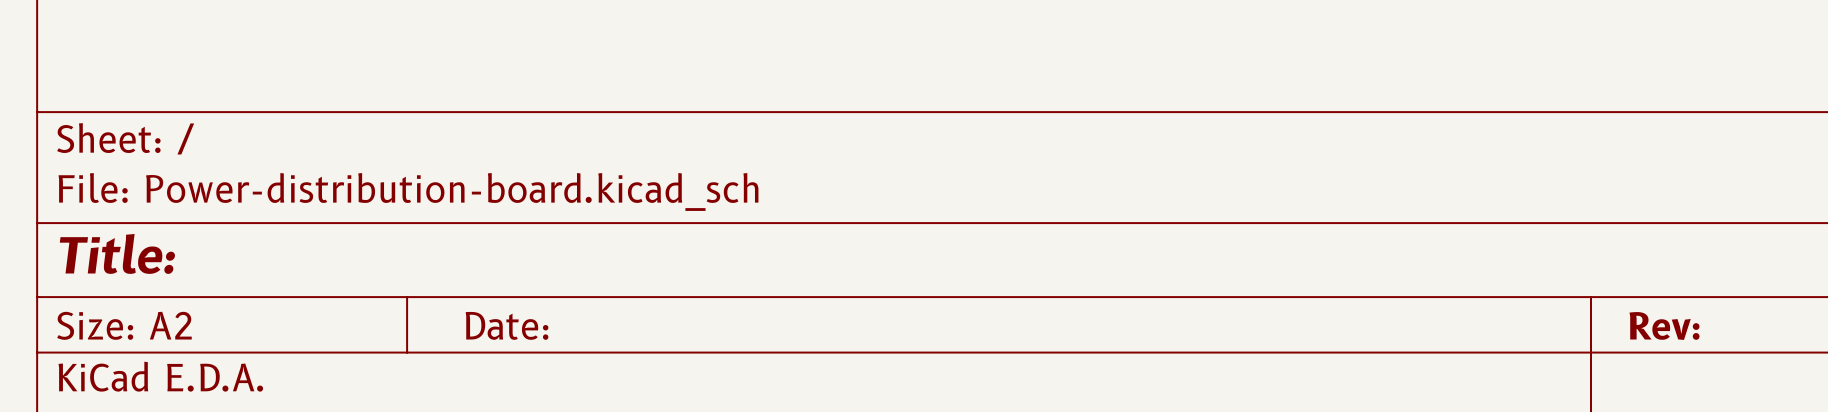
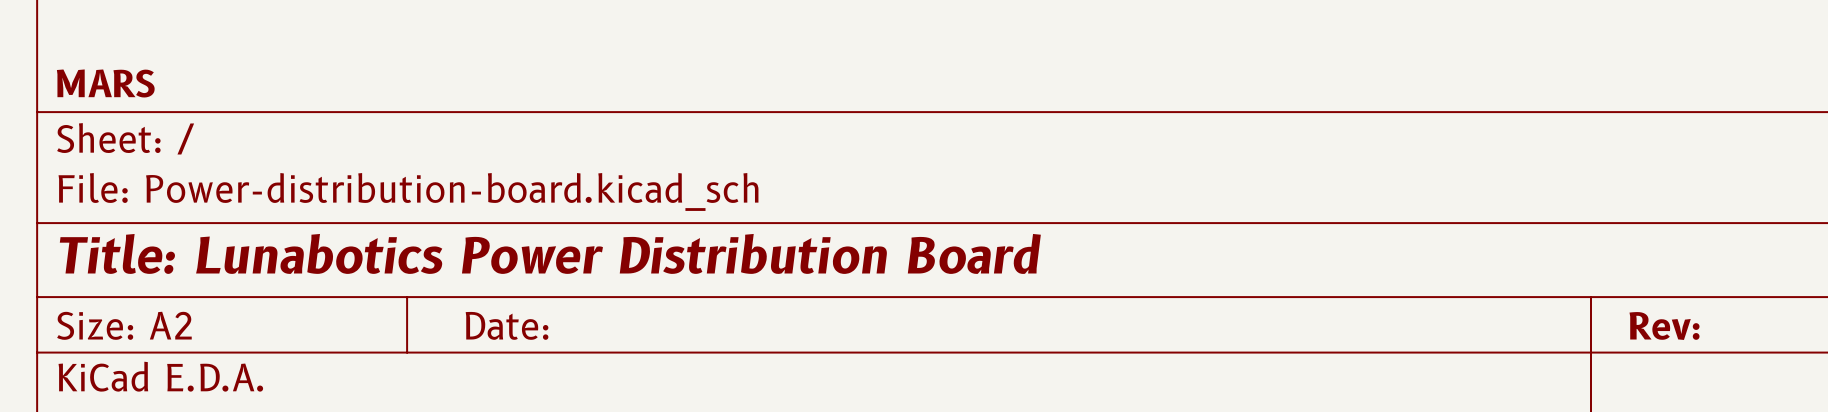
title block: none -> MARS (105, 83)
title block: Title: (117, 253) -> Title: Lunabotics Power Distribution Board (550, 253)

